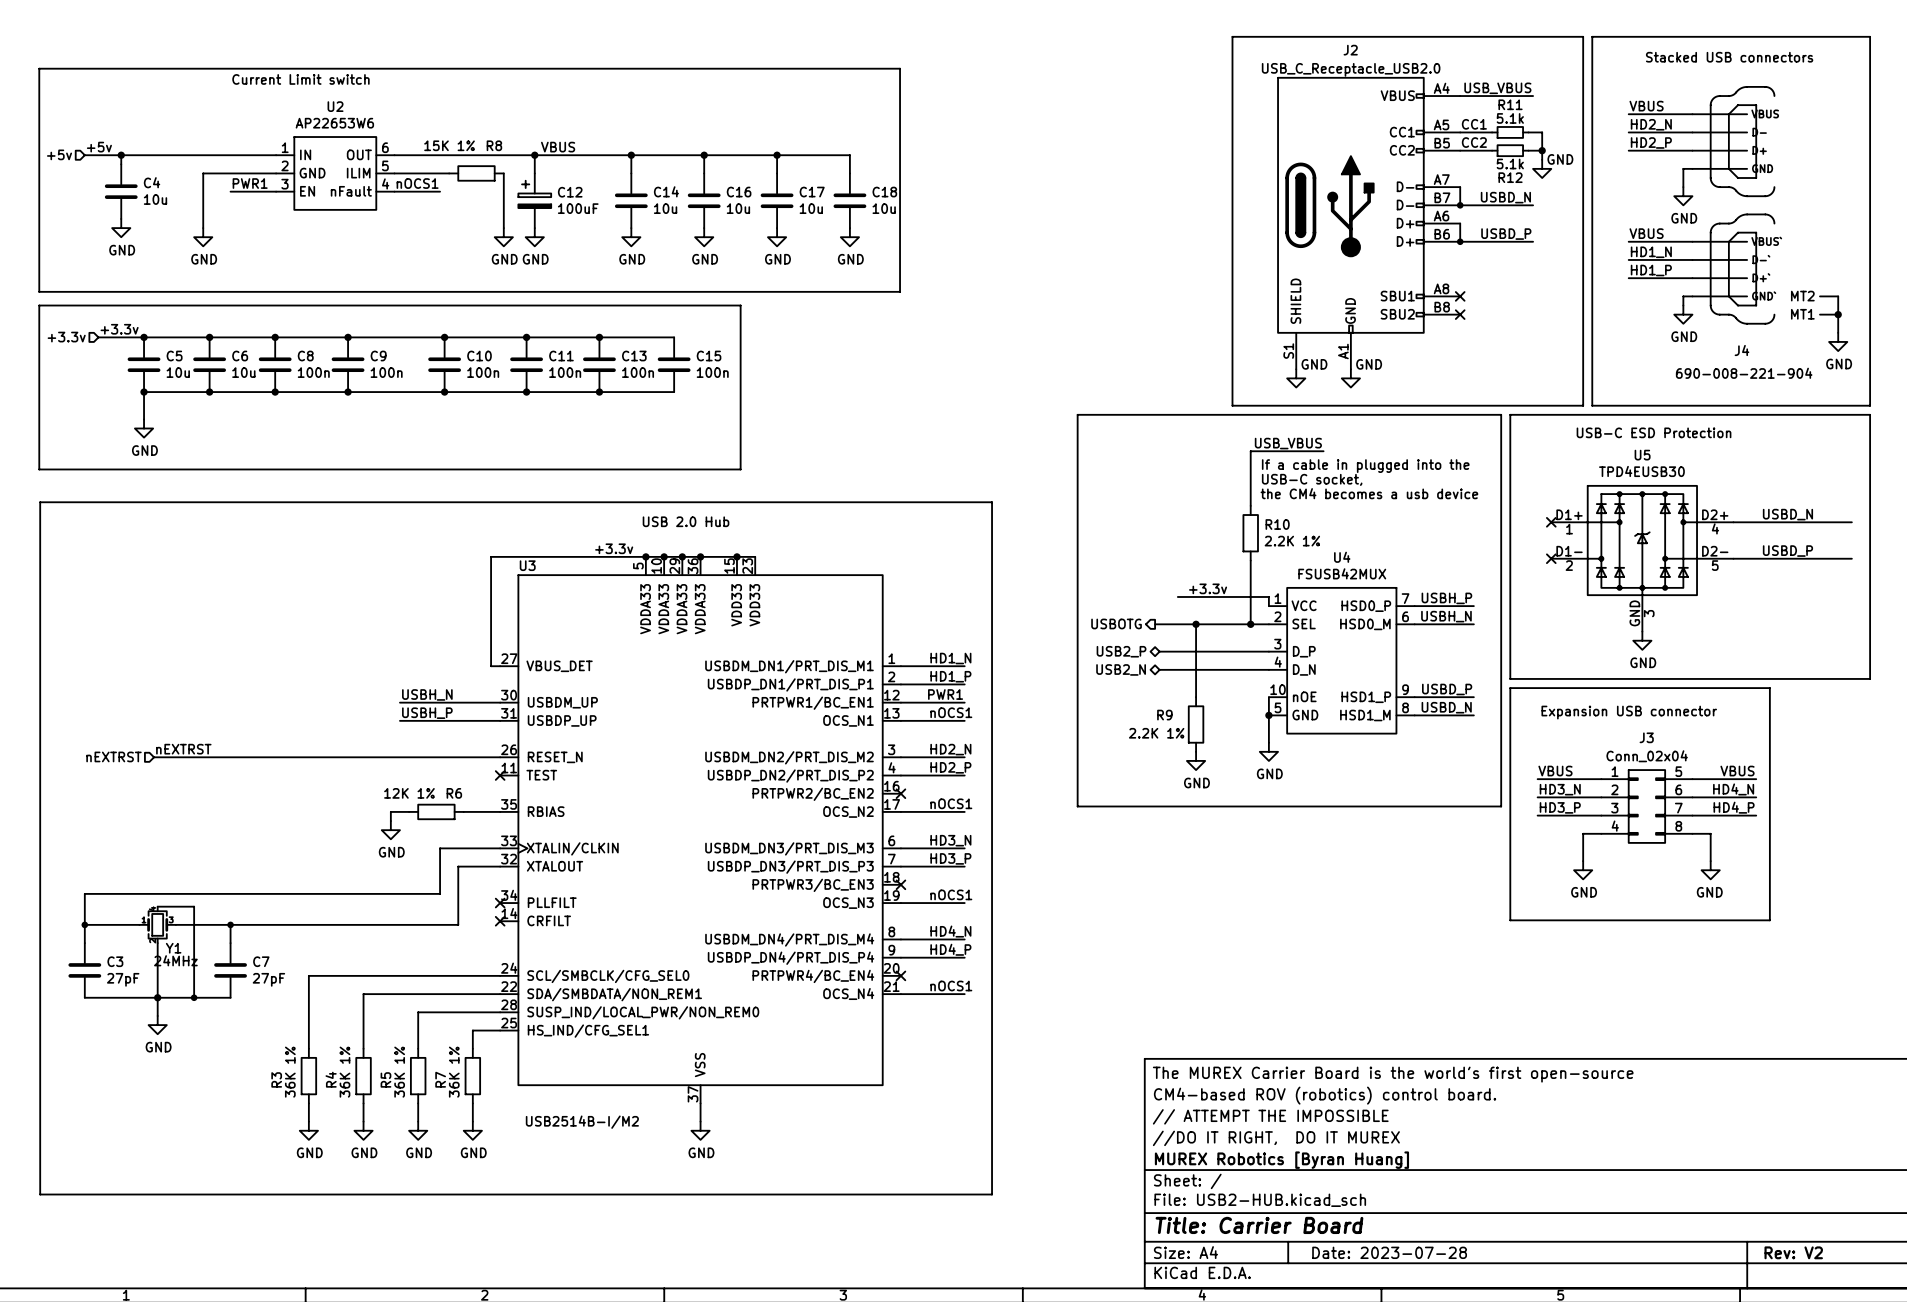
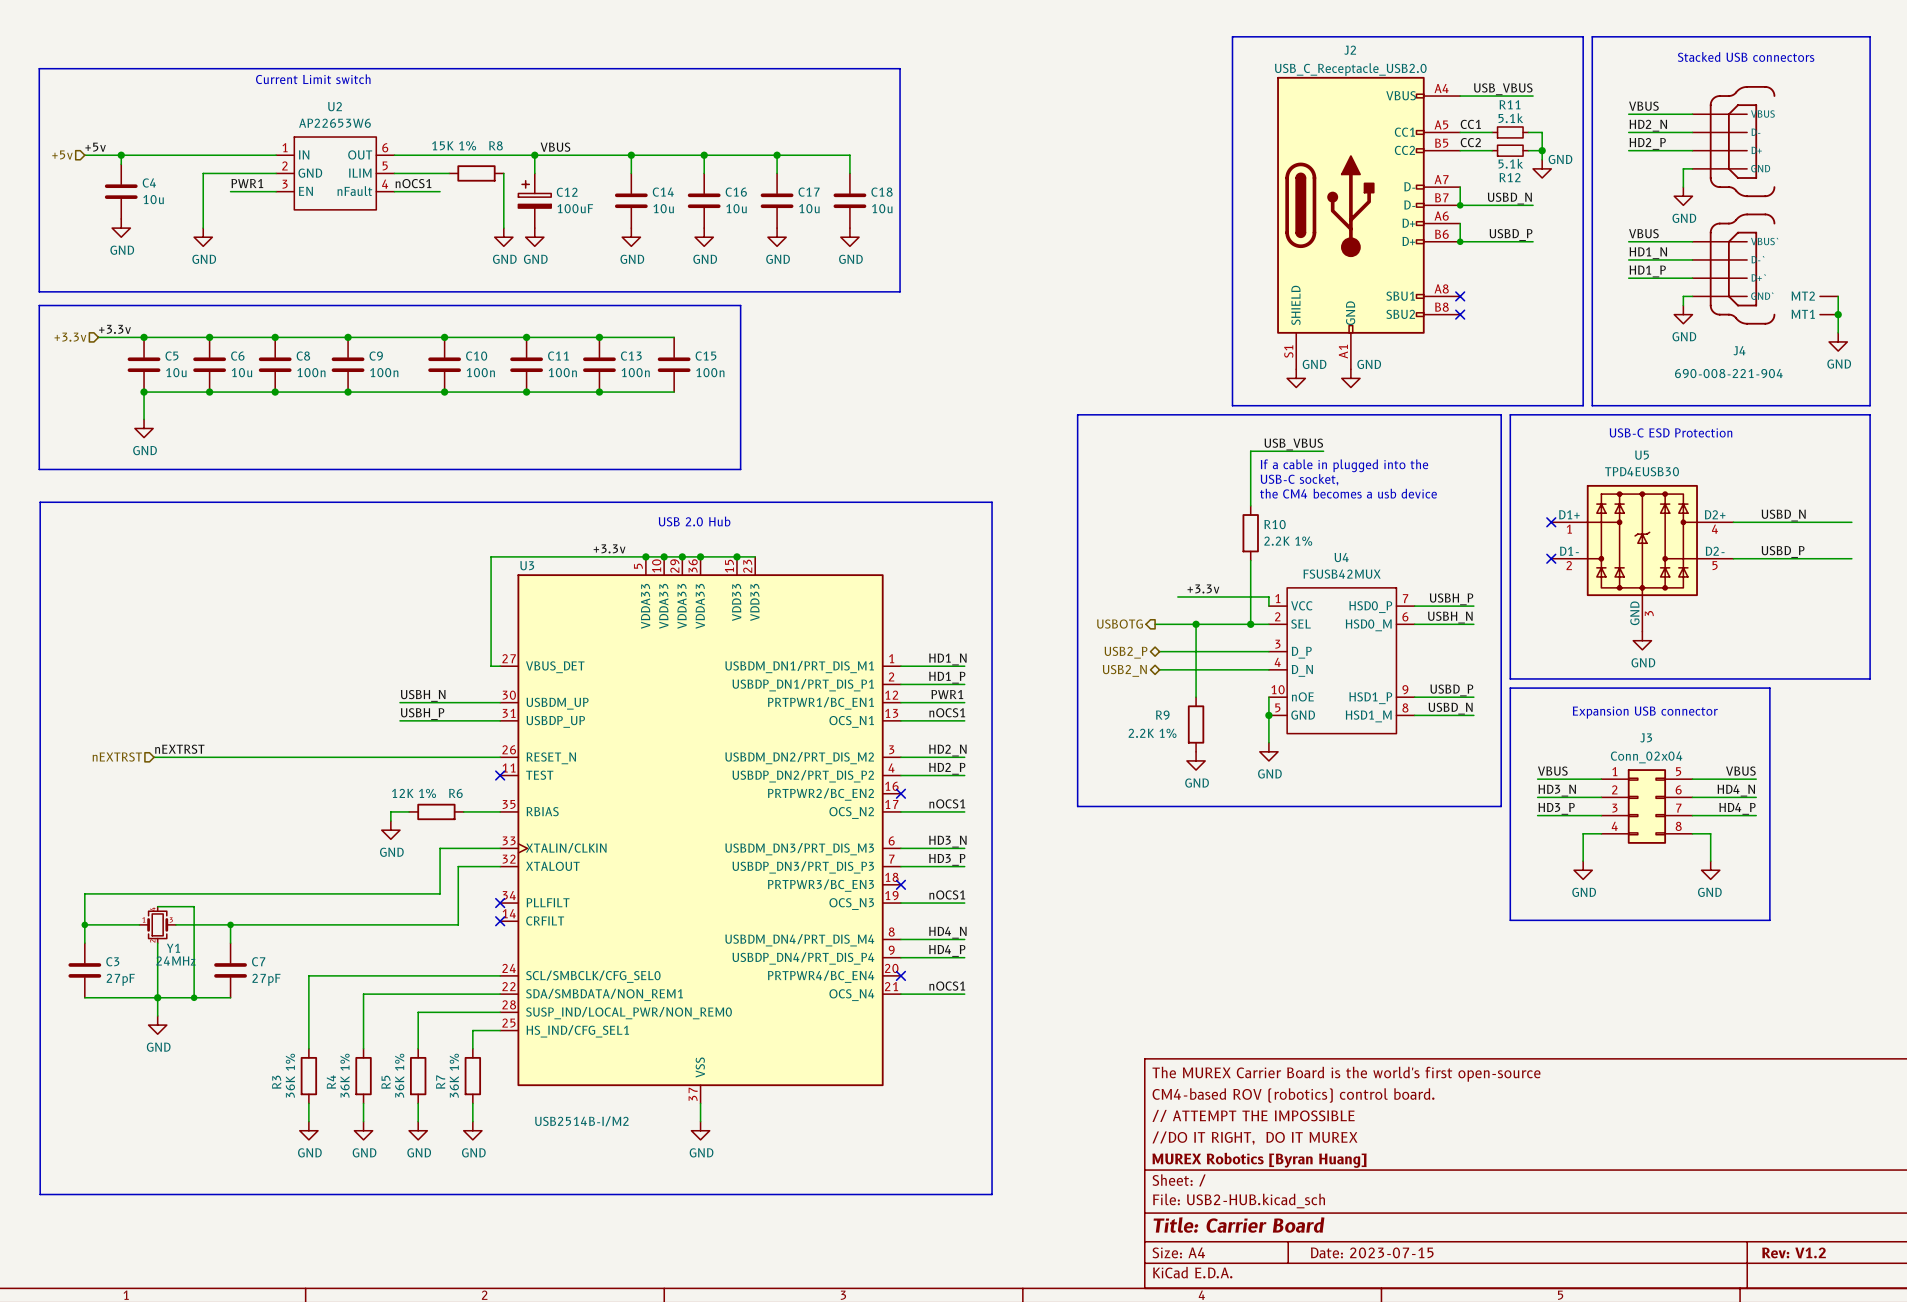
title block: Date: 2023-07-28 (1389, 1252) -> Date: 2023-07-15 (1372, 1252)
title block: Rev: V2 (1793, 1252) -> Rev: V1.2 (1794, 1252)

